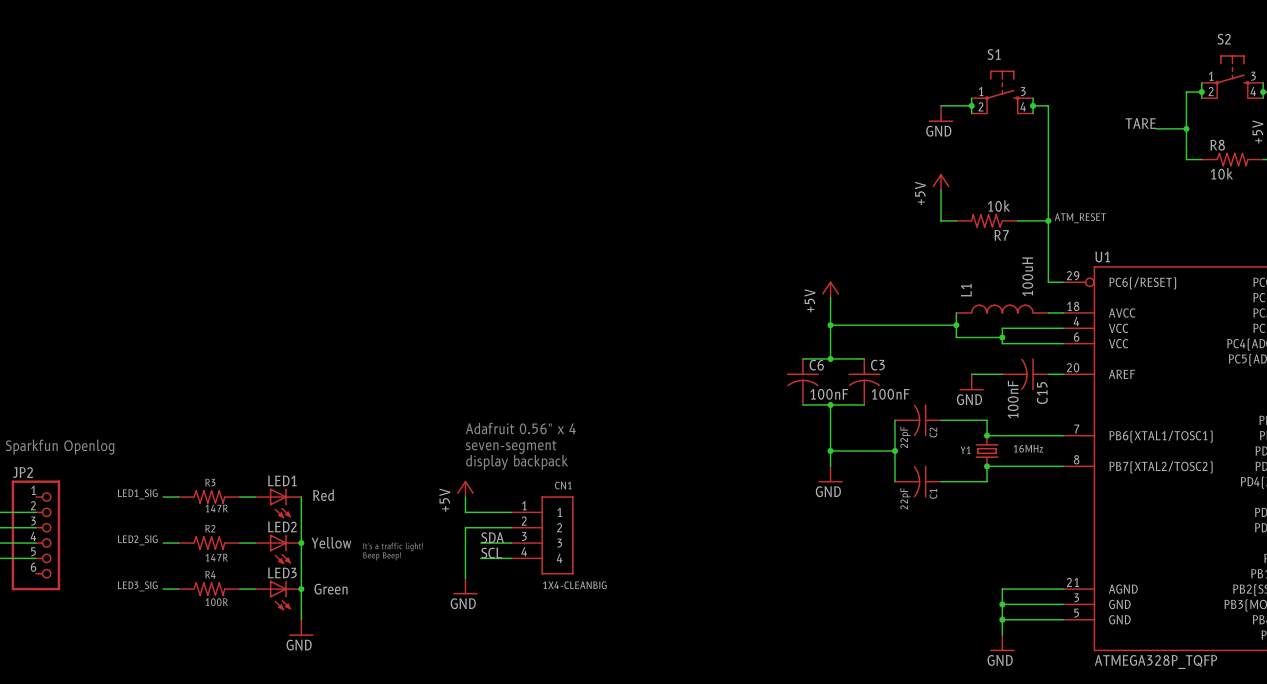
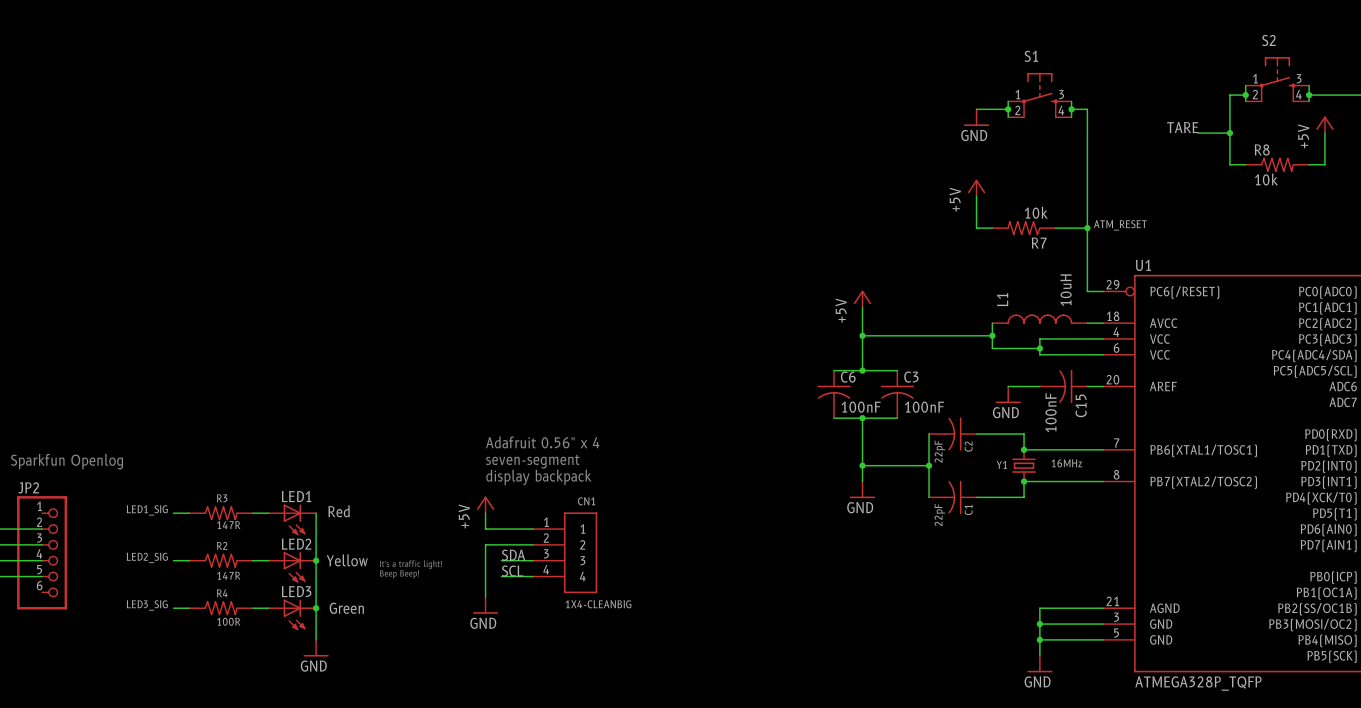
L1 value: 100uH (1027, 276) -> 10uH (1066, 290)

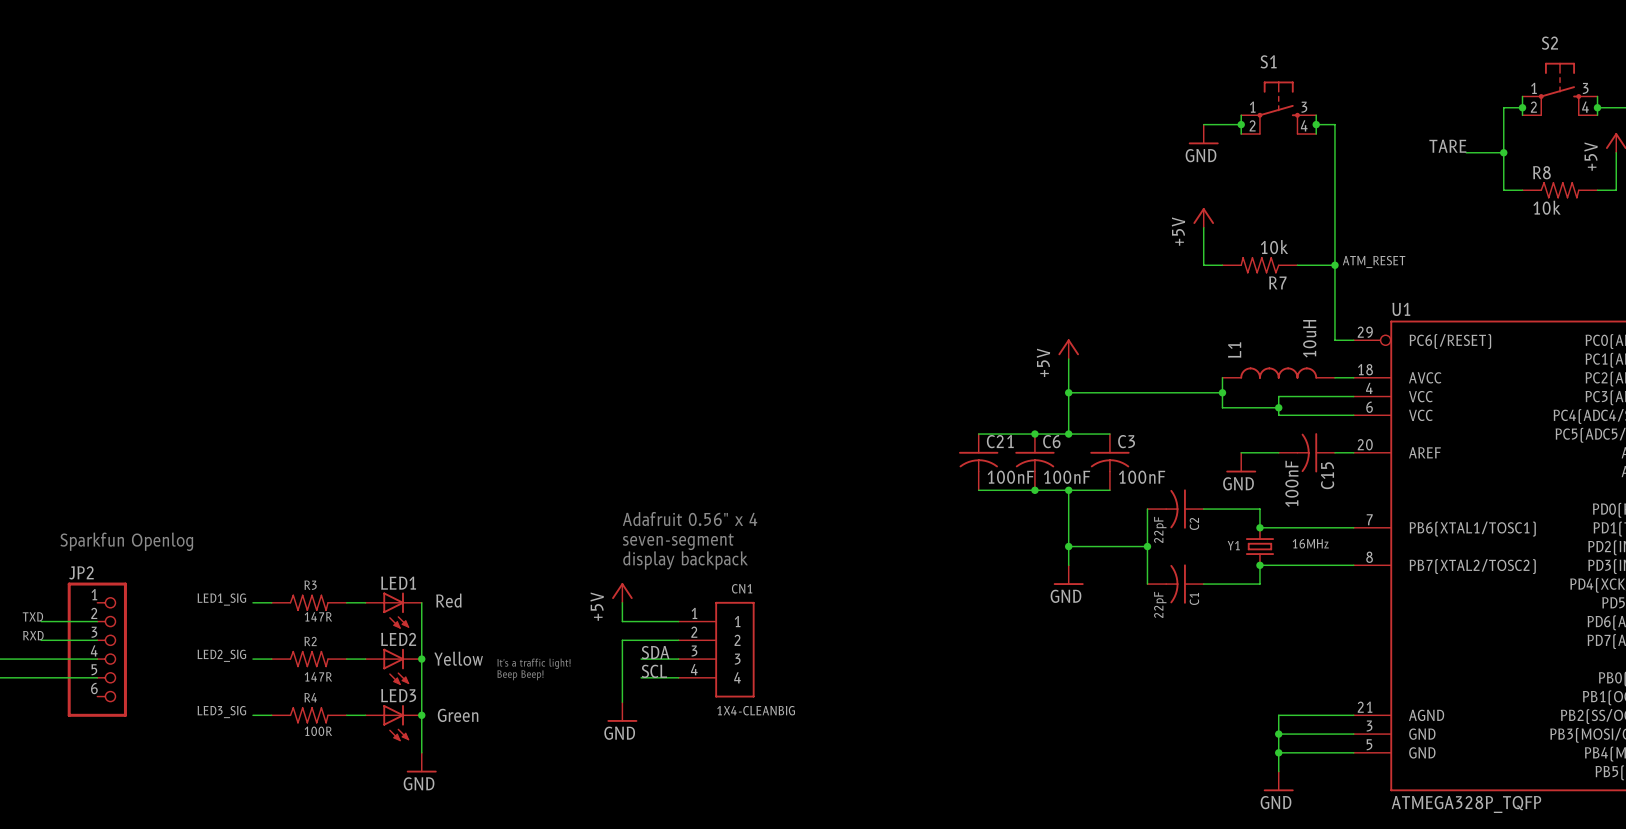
wire: none -> (978, 434) (1034, 434)
junction: none -> (1034, 434)
C21: none -> 100nF (978, 462)
wire: none -> (978, 490) (1034, 490)
junction: none -> (1034, 490)

